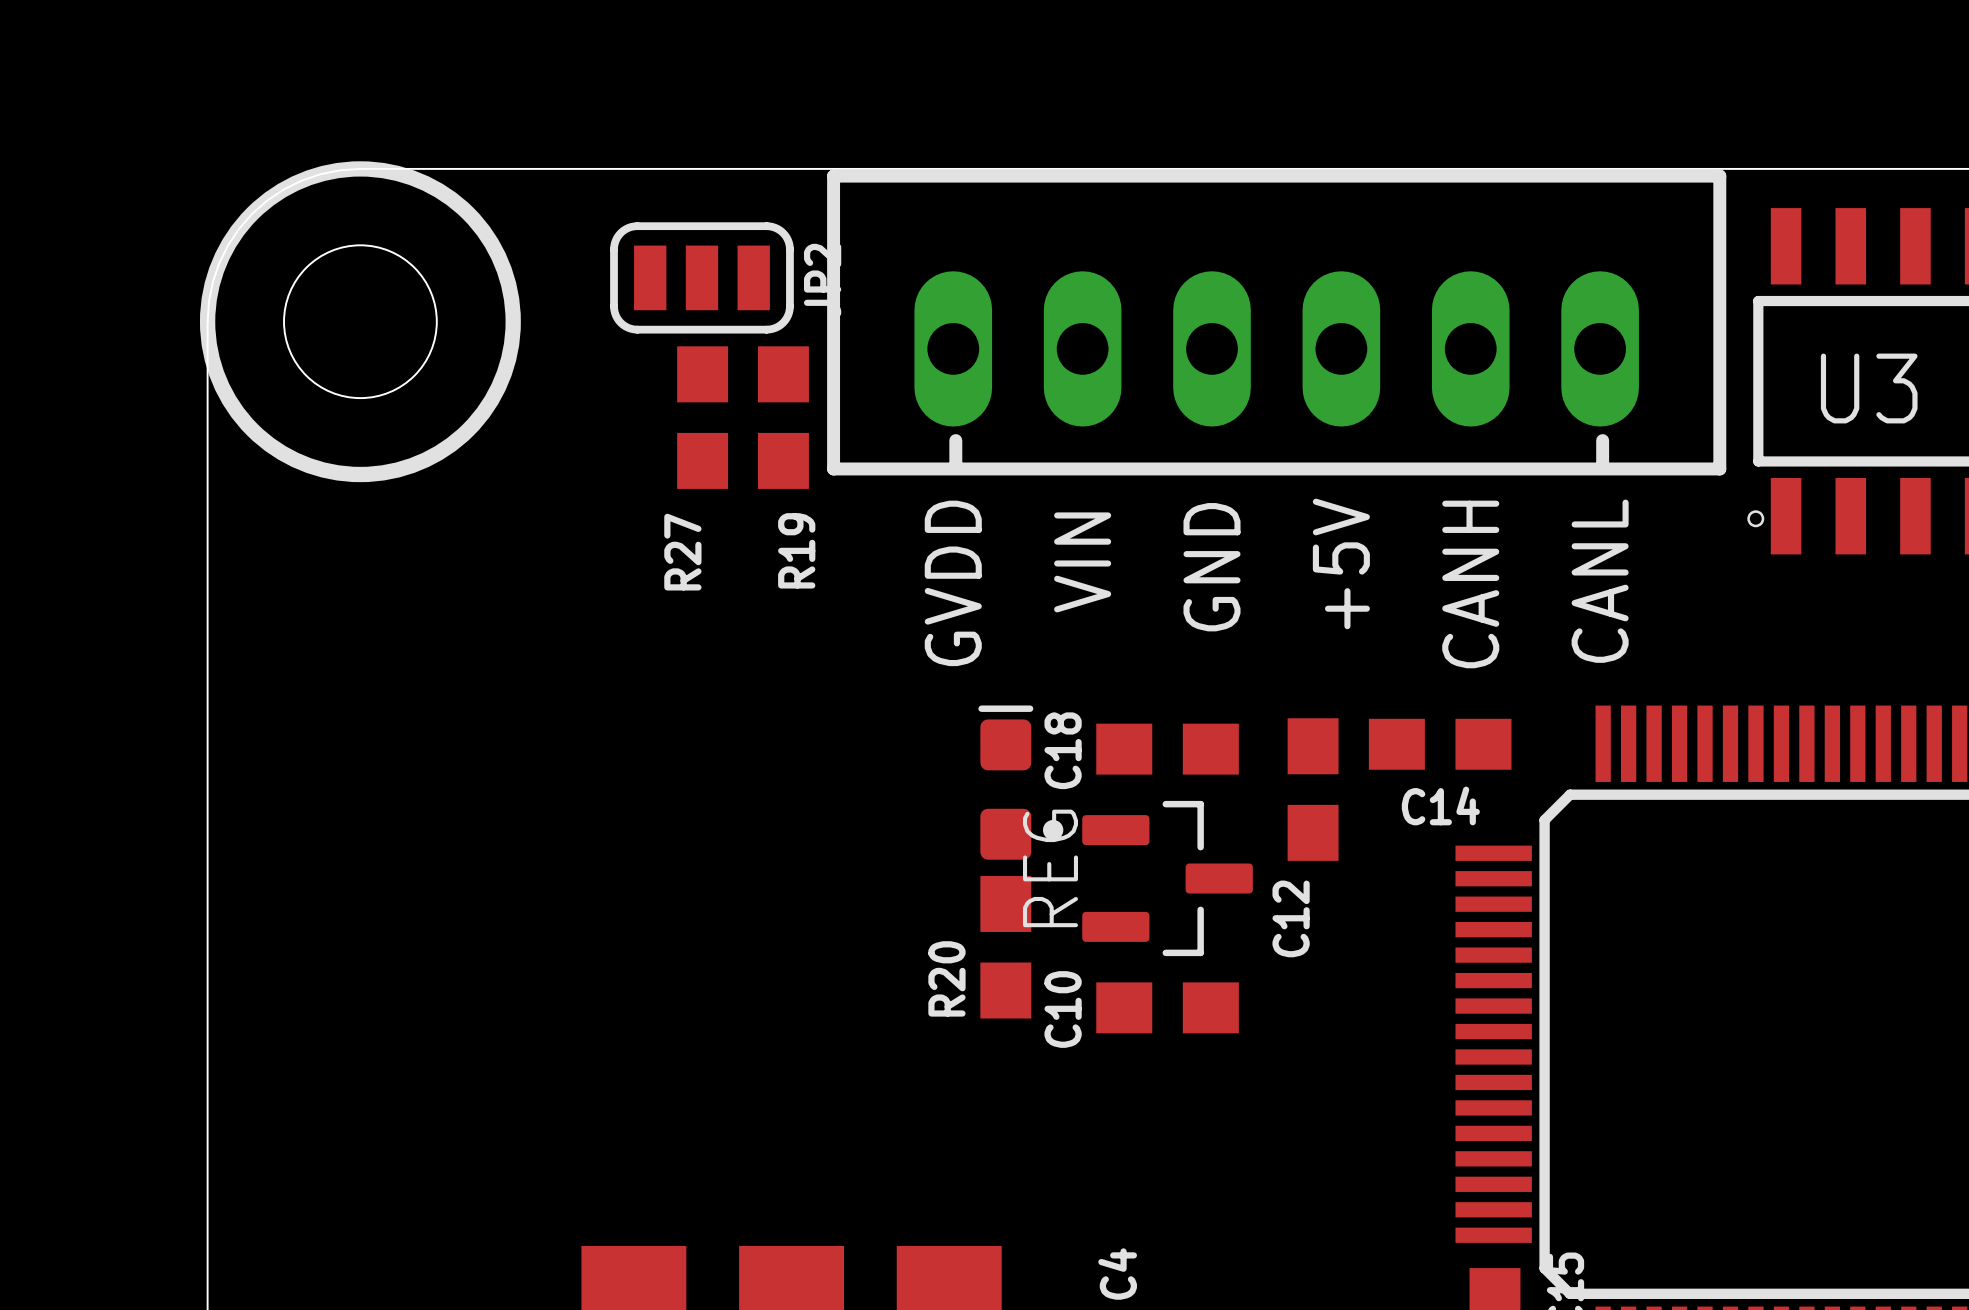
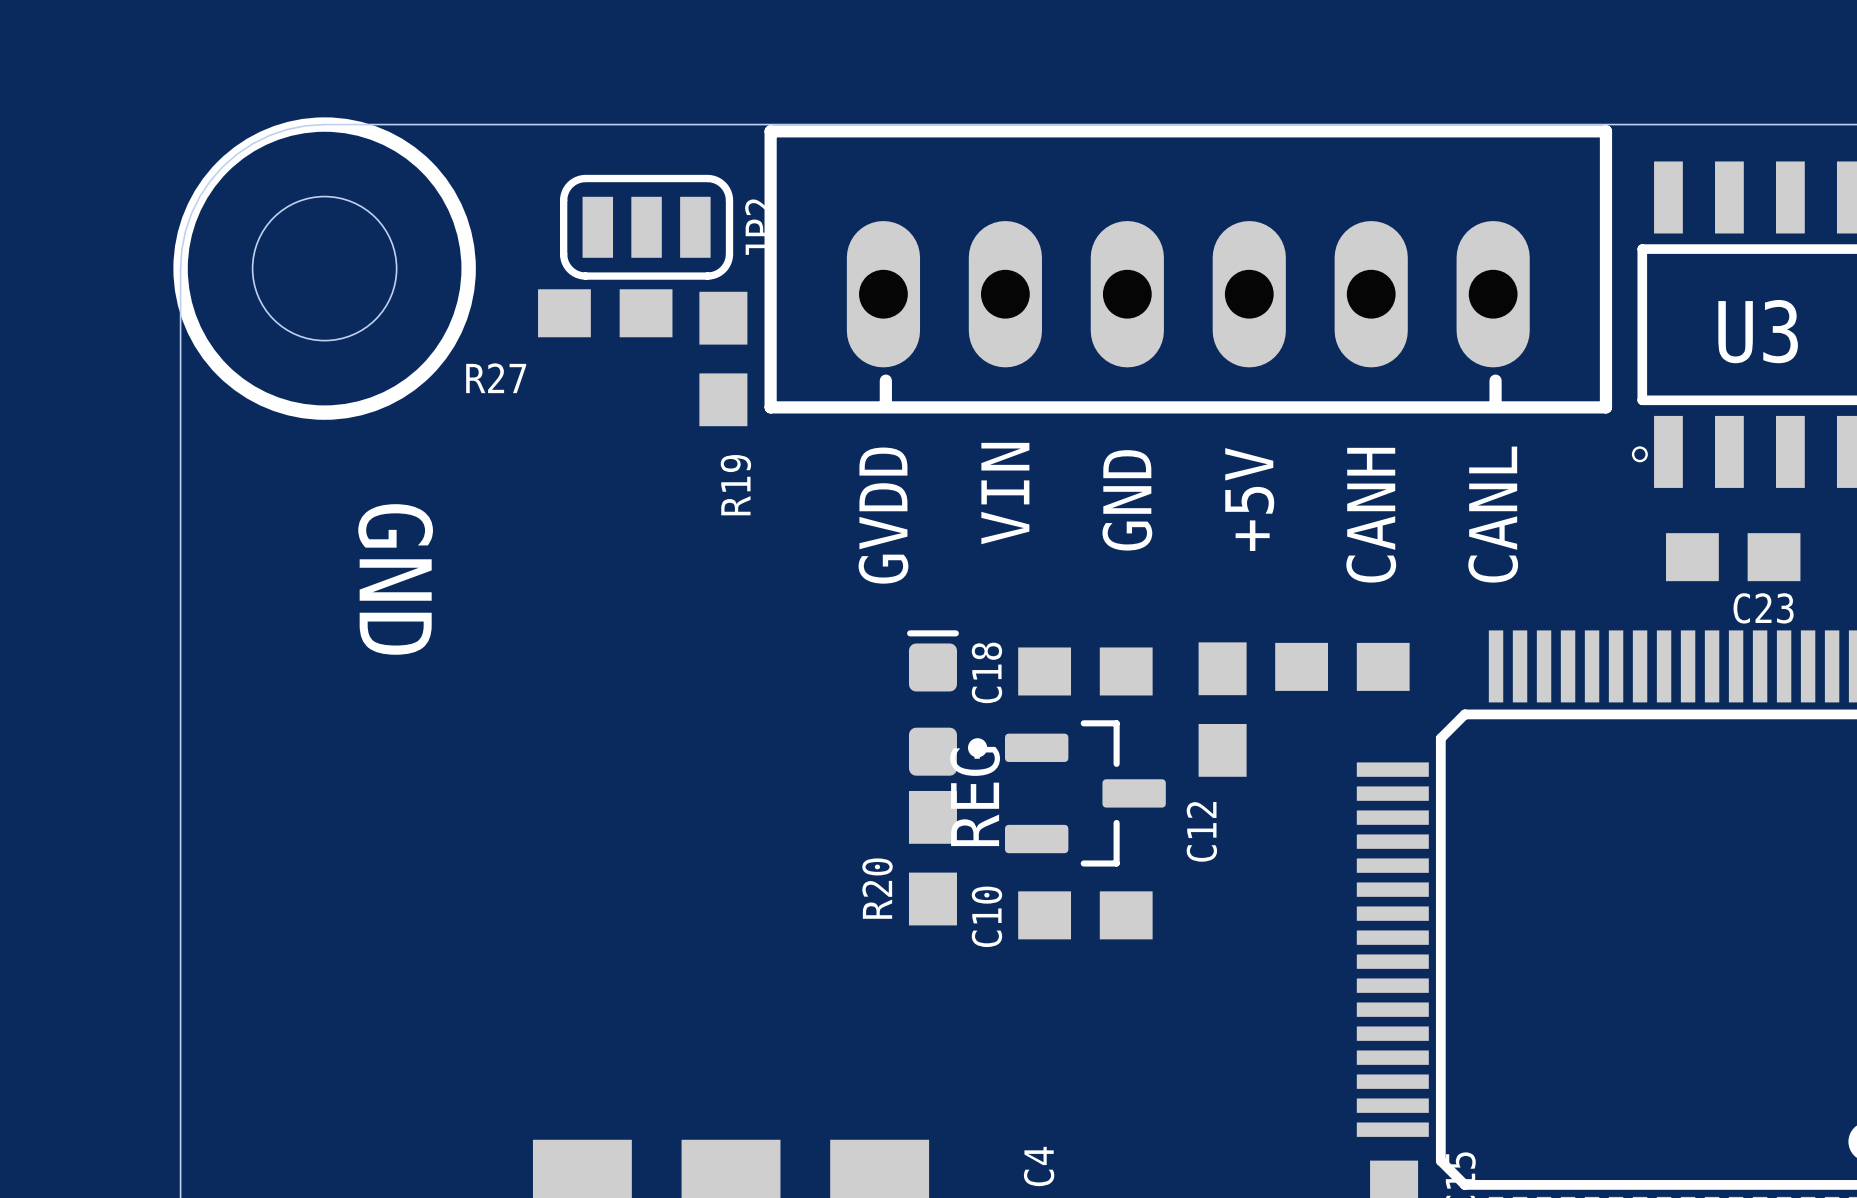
R27 rotation: 0° (702, 417) -> 90° clockwise (605, 313)
C23: none -> (1733, 557)
text: none -> GND (395, 579)
C14 name: C14 (1440, 805) -> none

